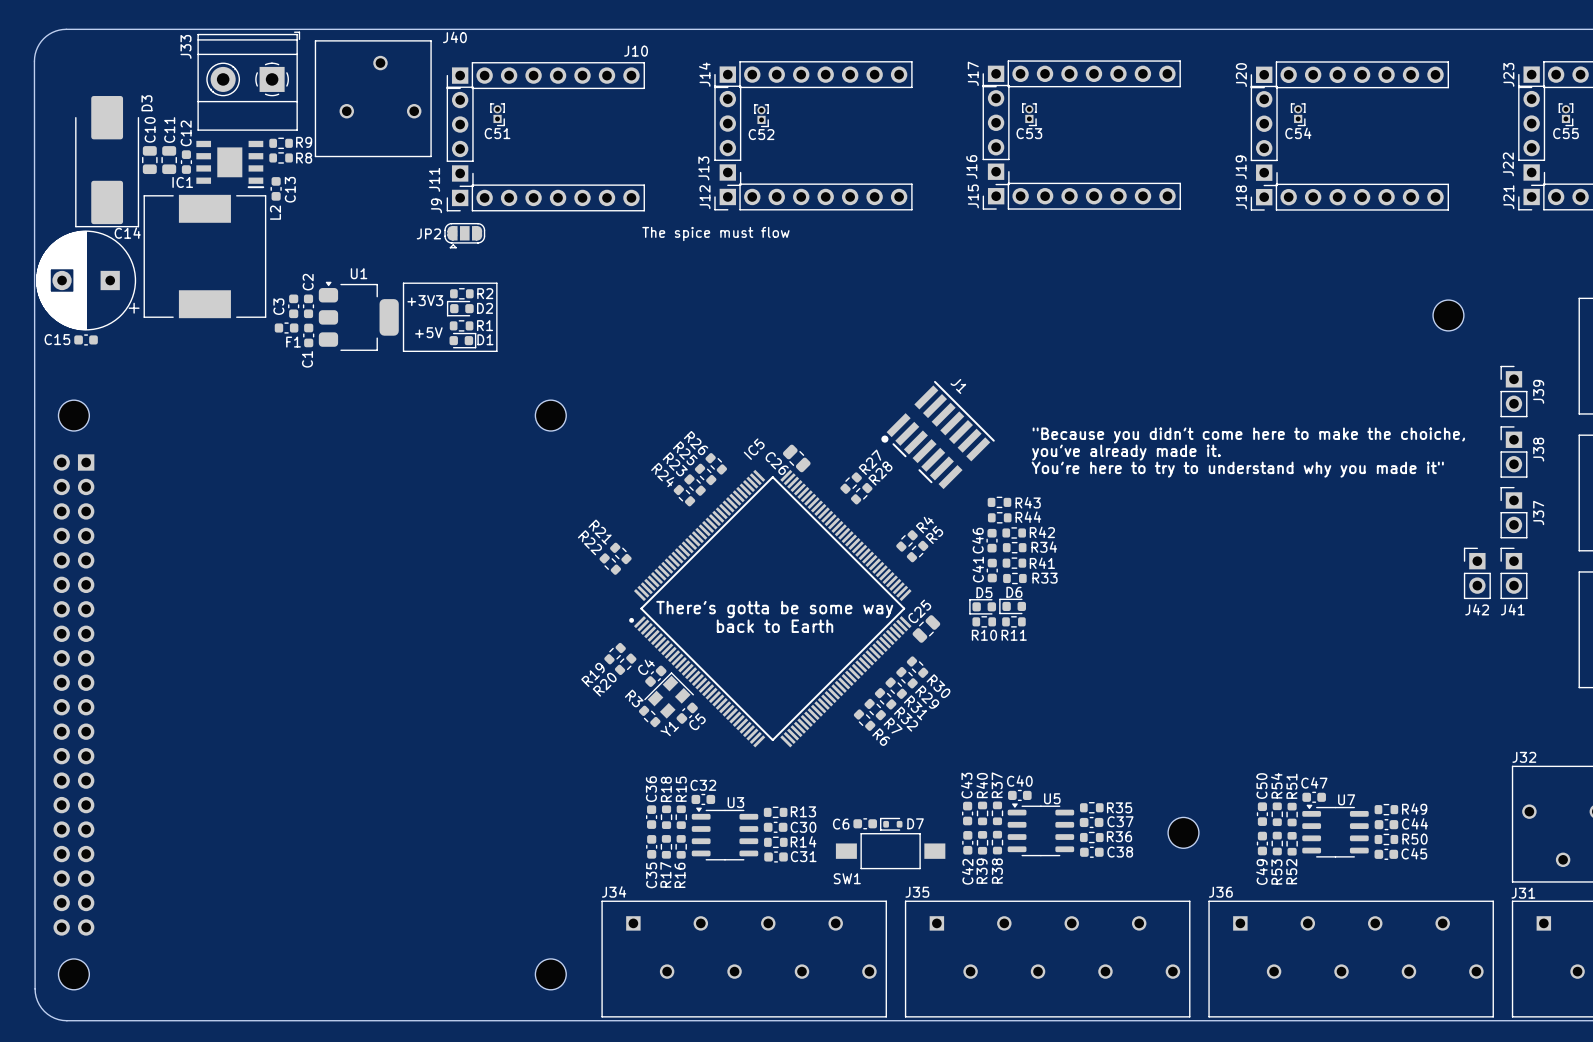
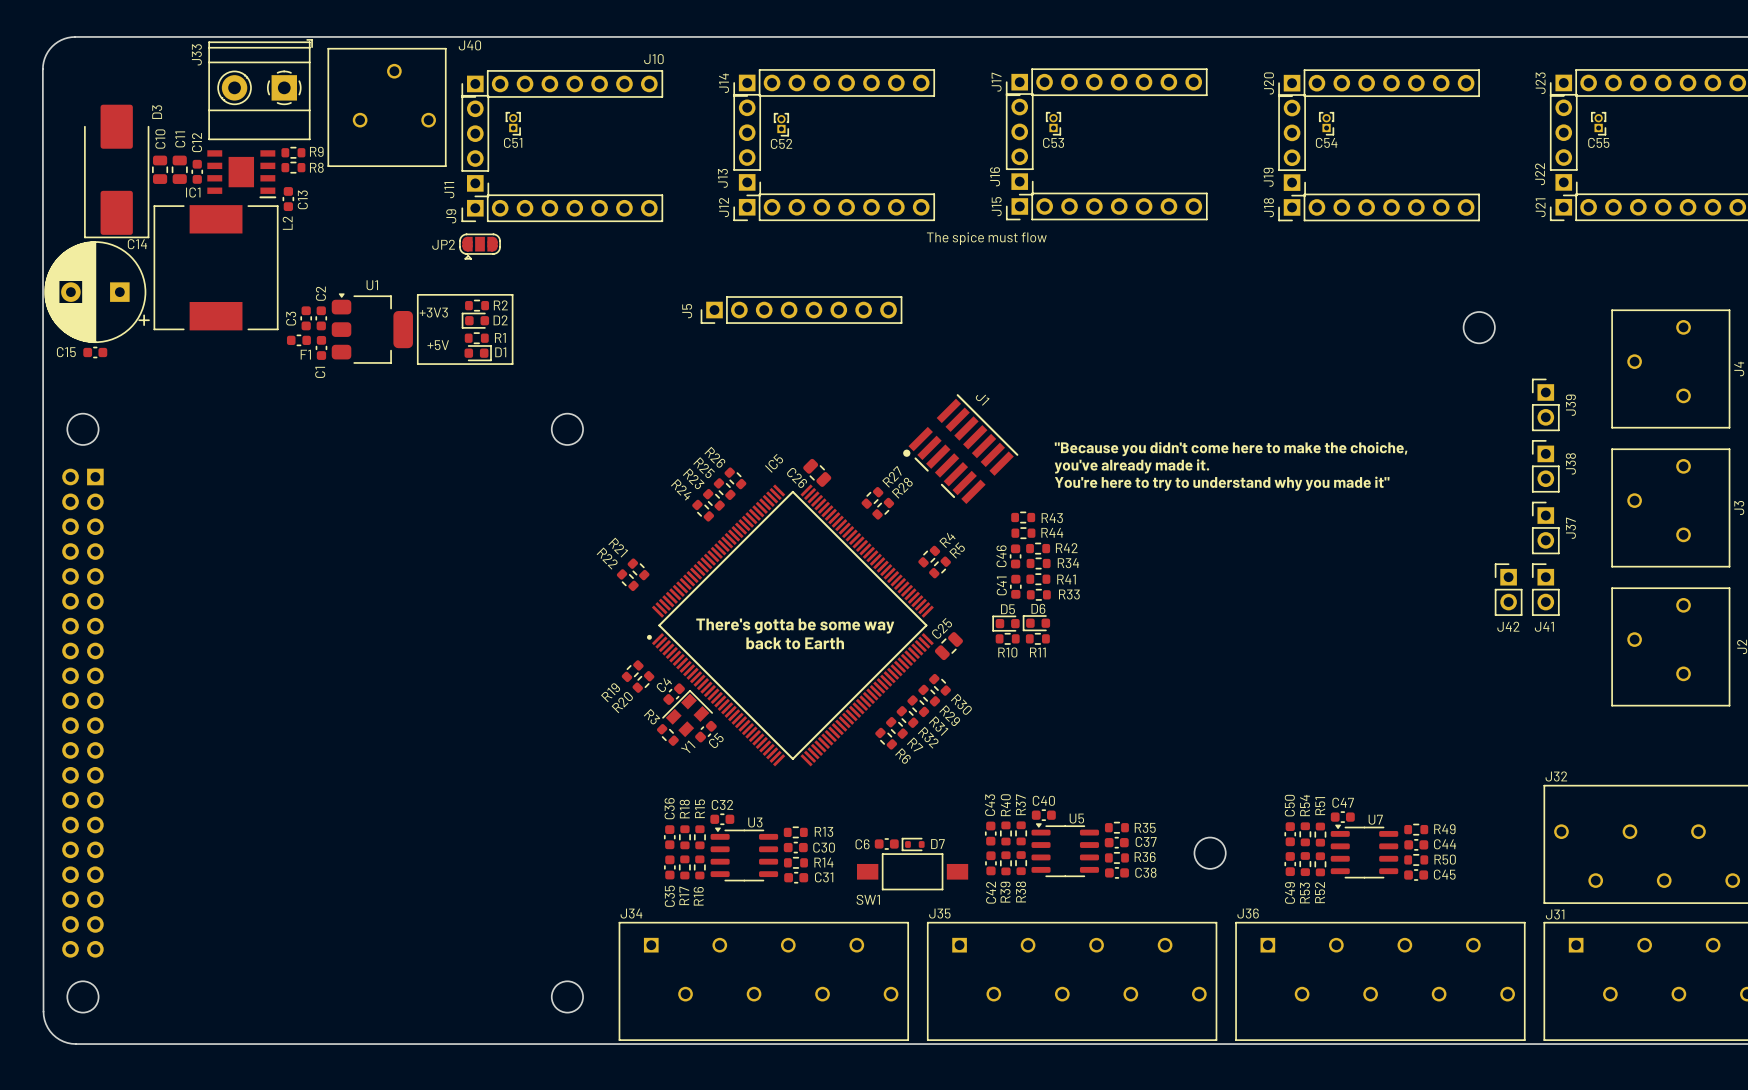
text: none -> The spice must flow (986, 238)
text: The spice must flow (715, 234) -> none
J5: none -> (801, 310)

